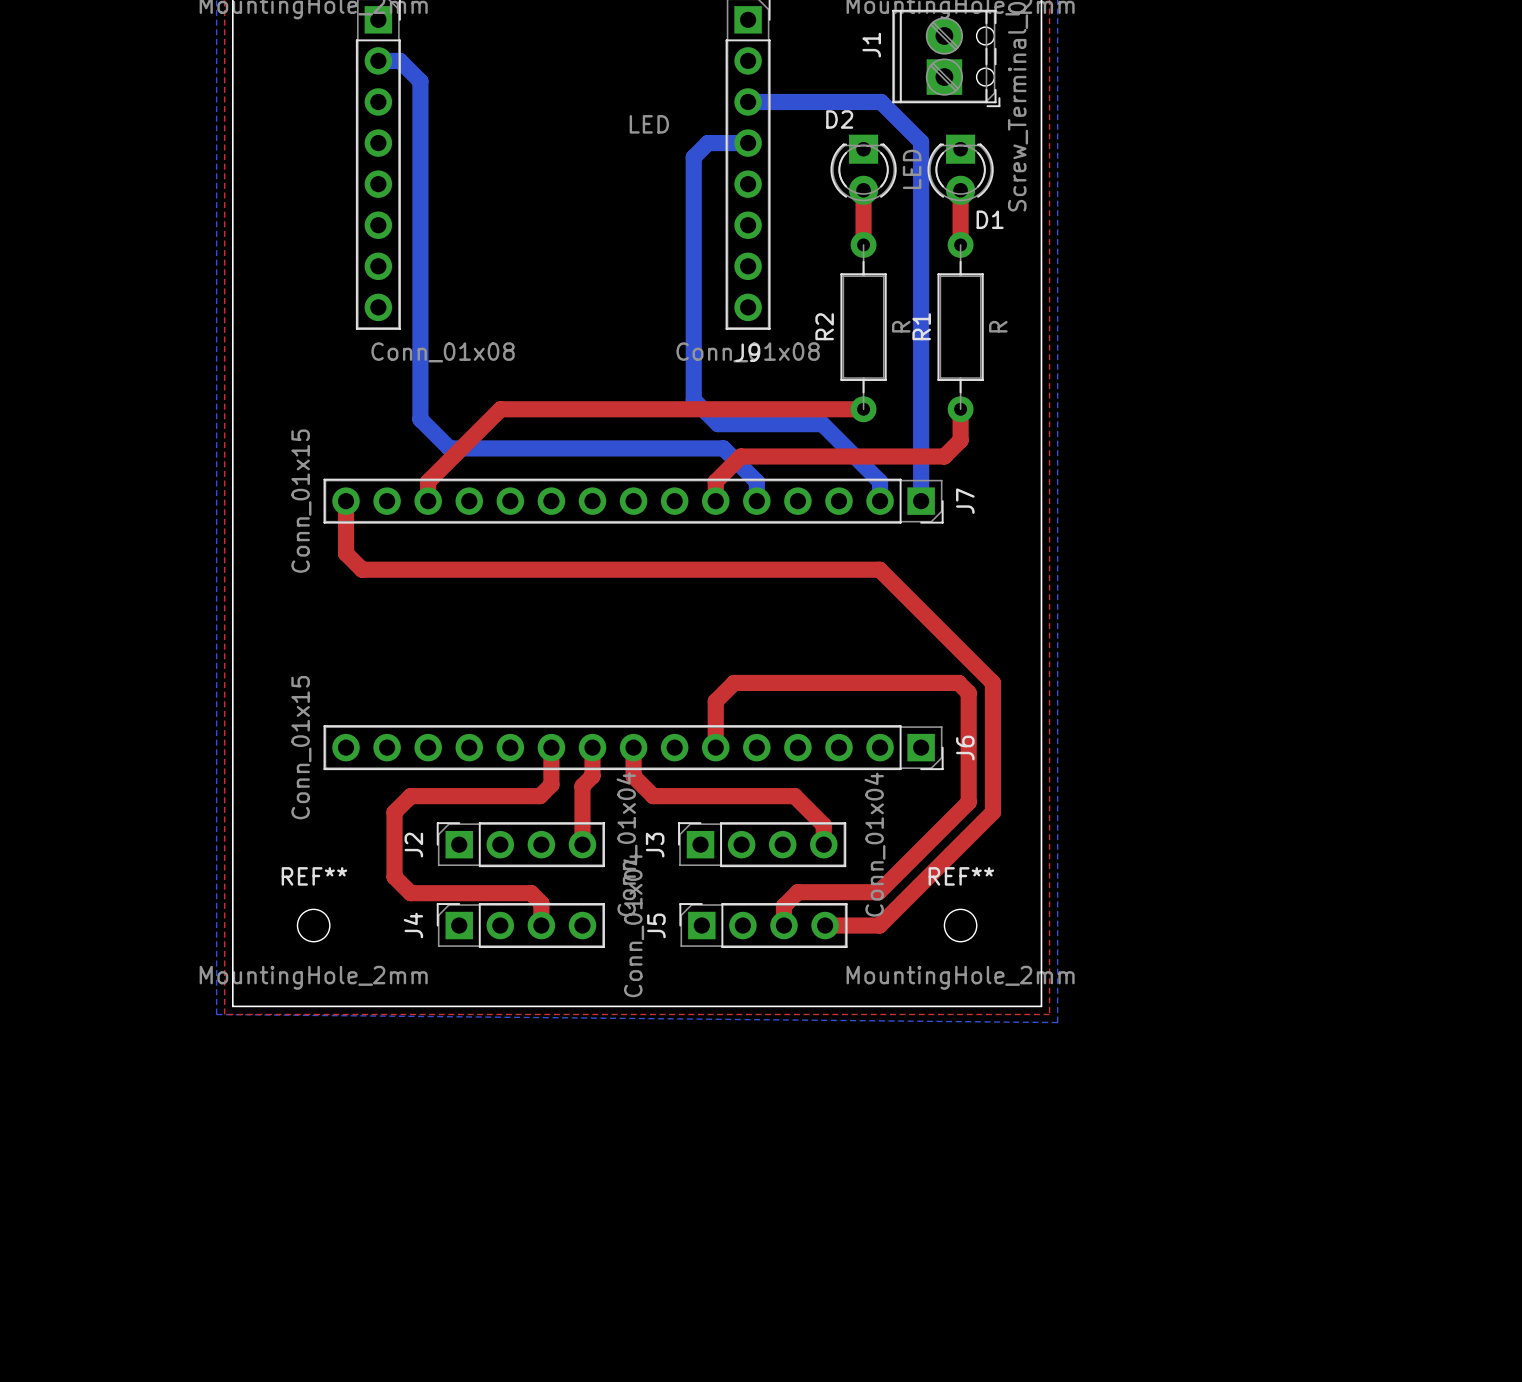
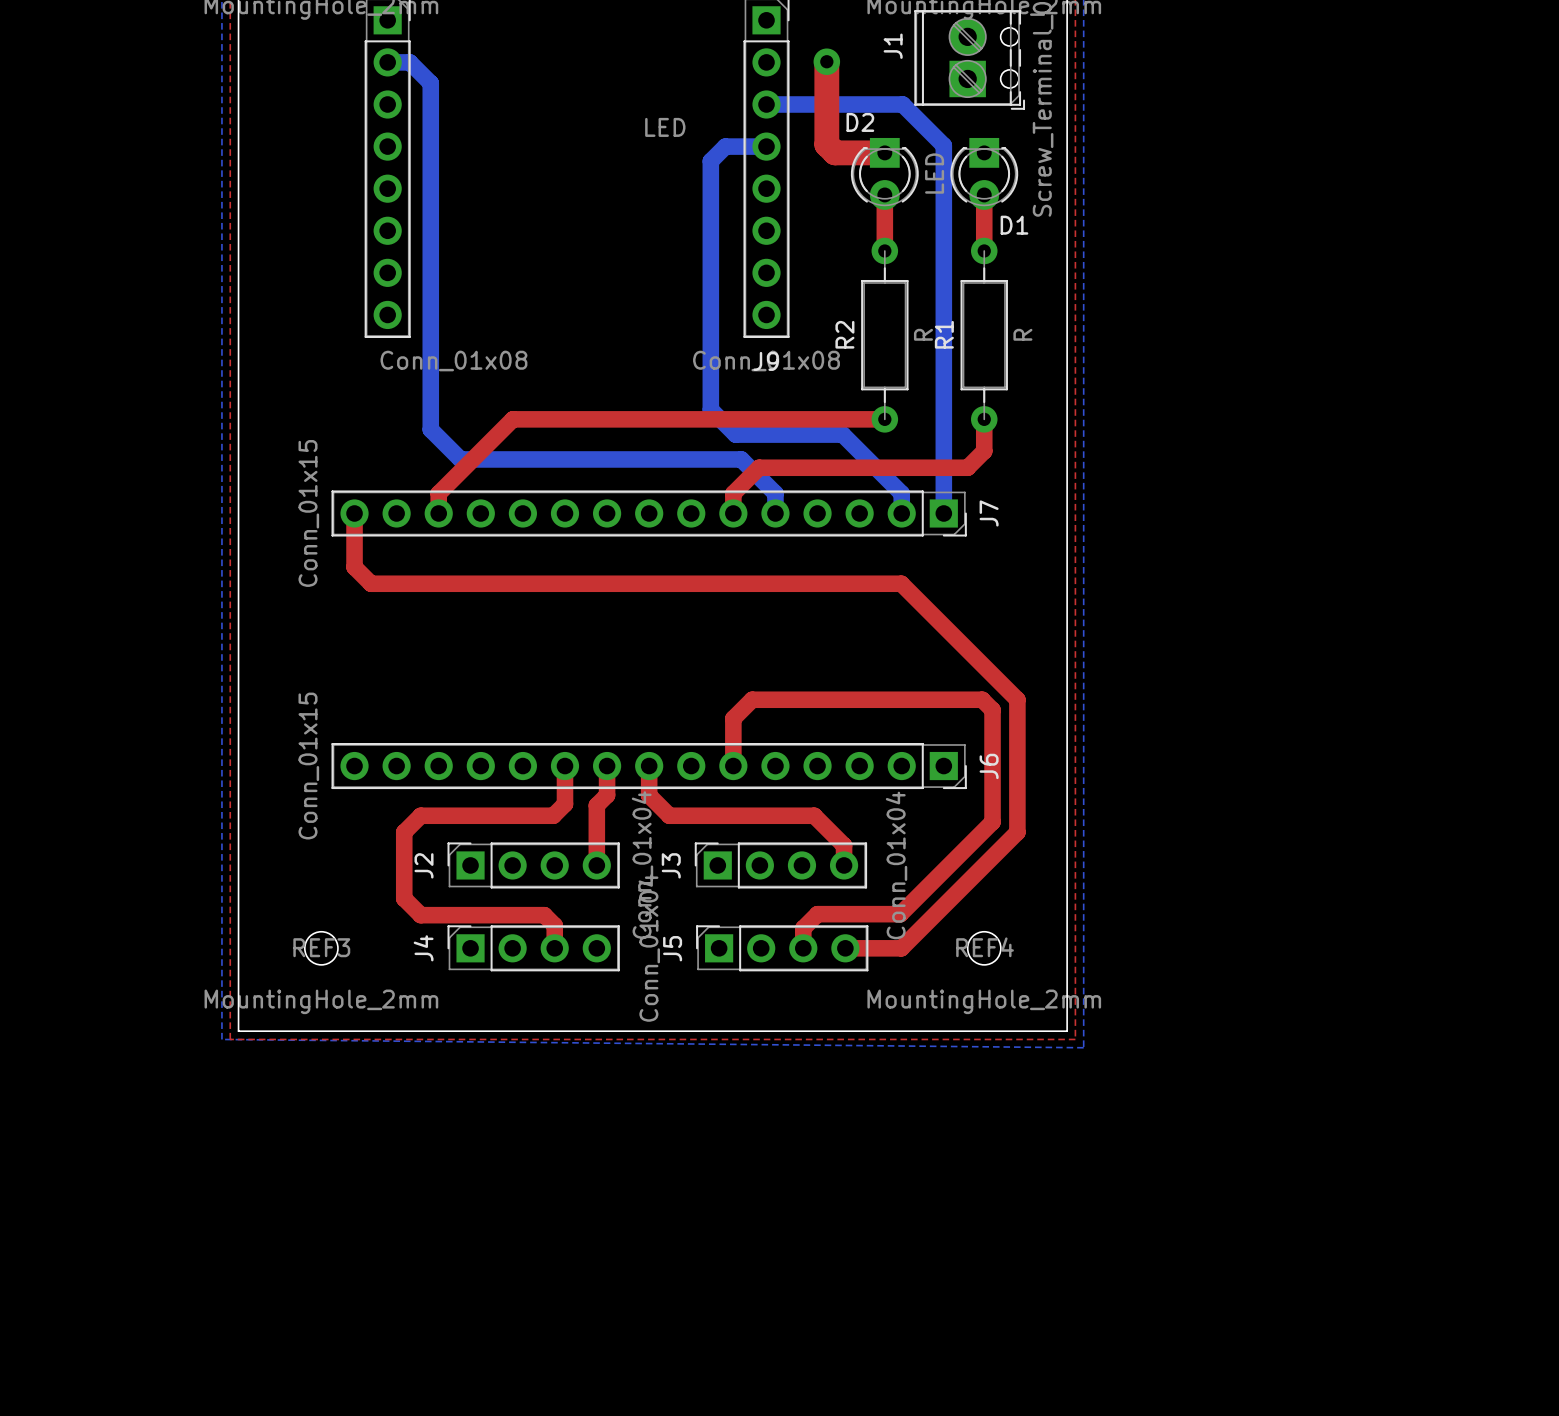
top track: none -> (826, 61) (826, 144) (835, 152) (884, 152)
via: none -> (826, 61)
REF** name: REF** (314, 876) -> REF3 (321, 947)
REF** name: REF** (961, 876) -> REF4 (985, 947)

